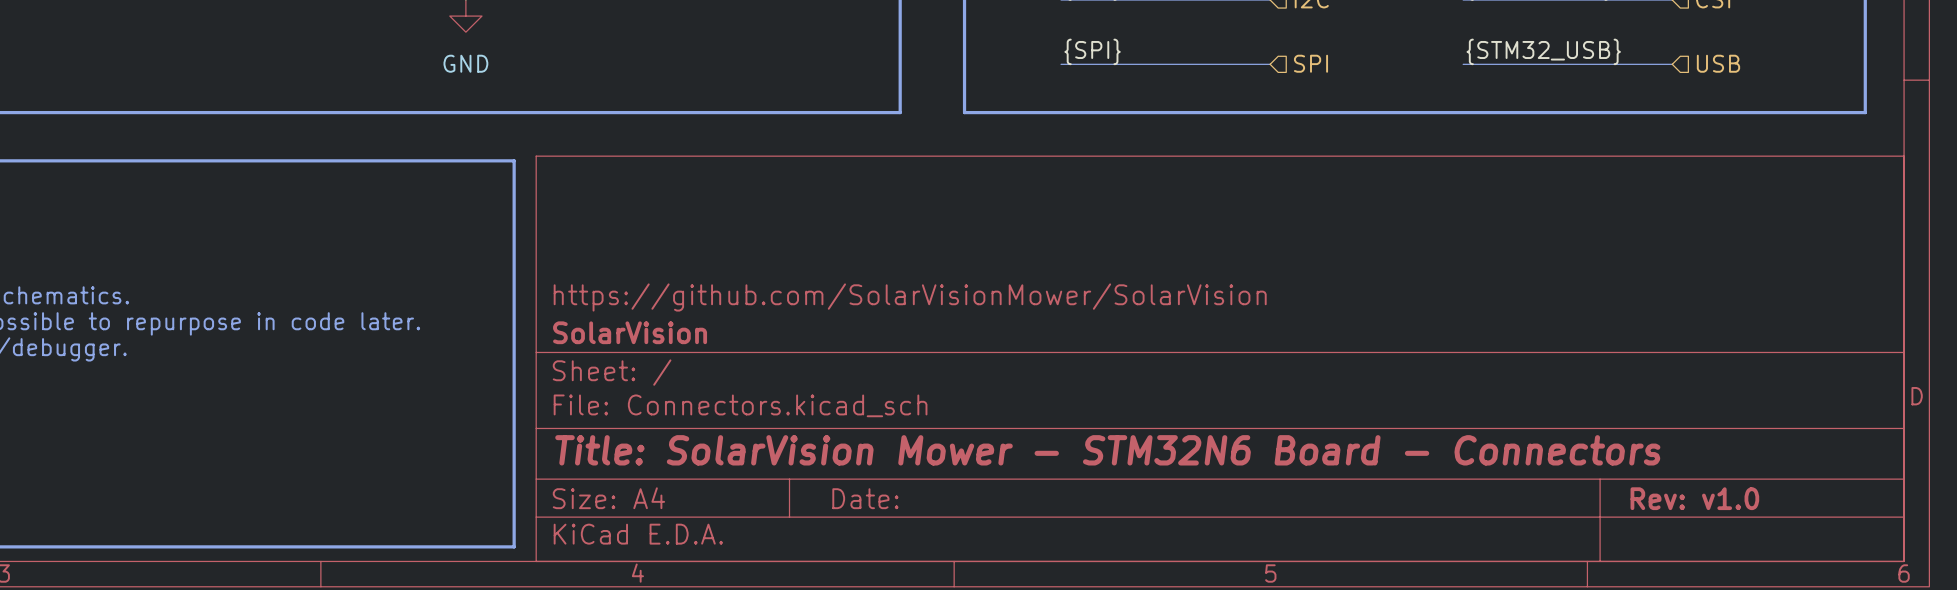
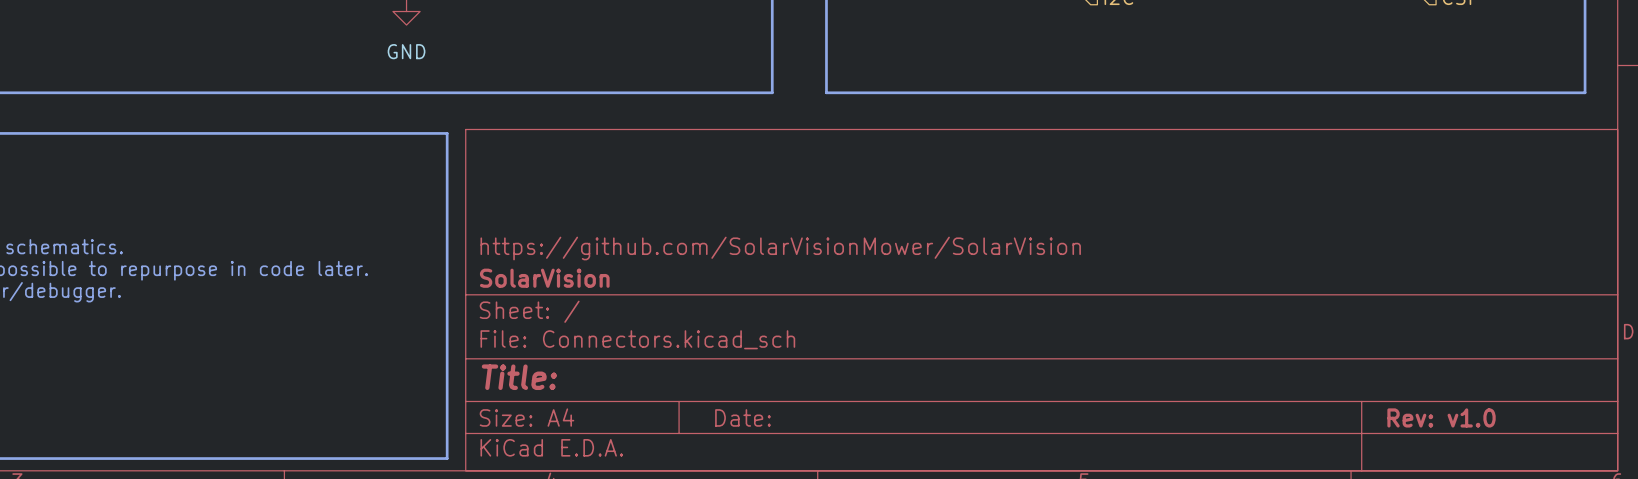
label: {SPI} (1092, 51) -> none
label: {STM32_USB} (1543, 51) -> none
hierarchical label: SPI (1311, 63) -> none
hierarchical label: USB (1718, 63) -> none
bus: (1061, 64) (1270, 64) -> none
bus: (1463, 64) (1672, 64) -> none
title block: Title: SolarVision Mower - STM32N6 Board - Connectors (1107, 450) -> Title: (519, 377)

